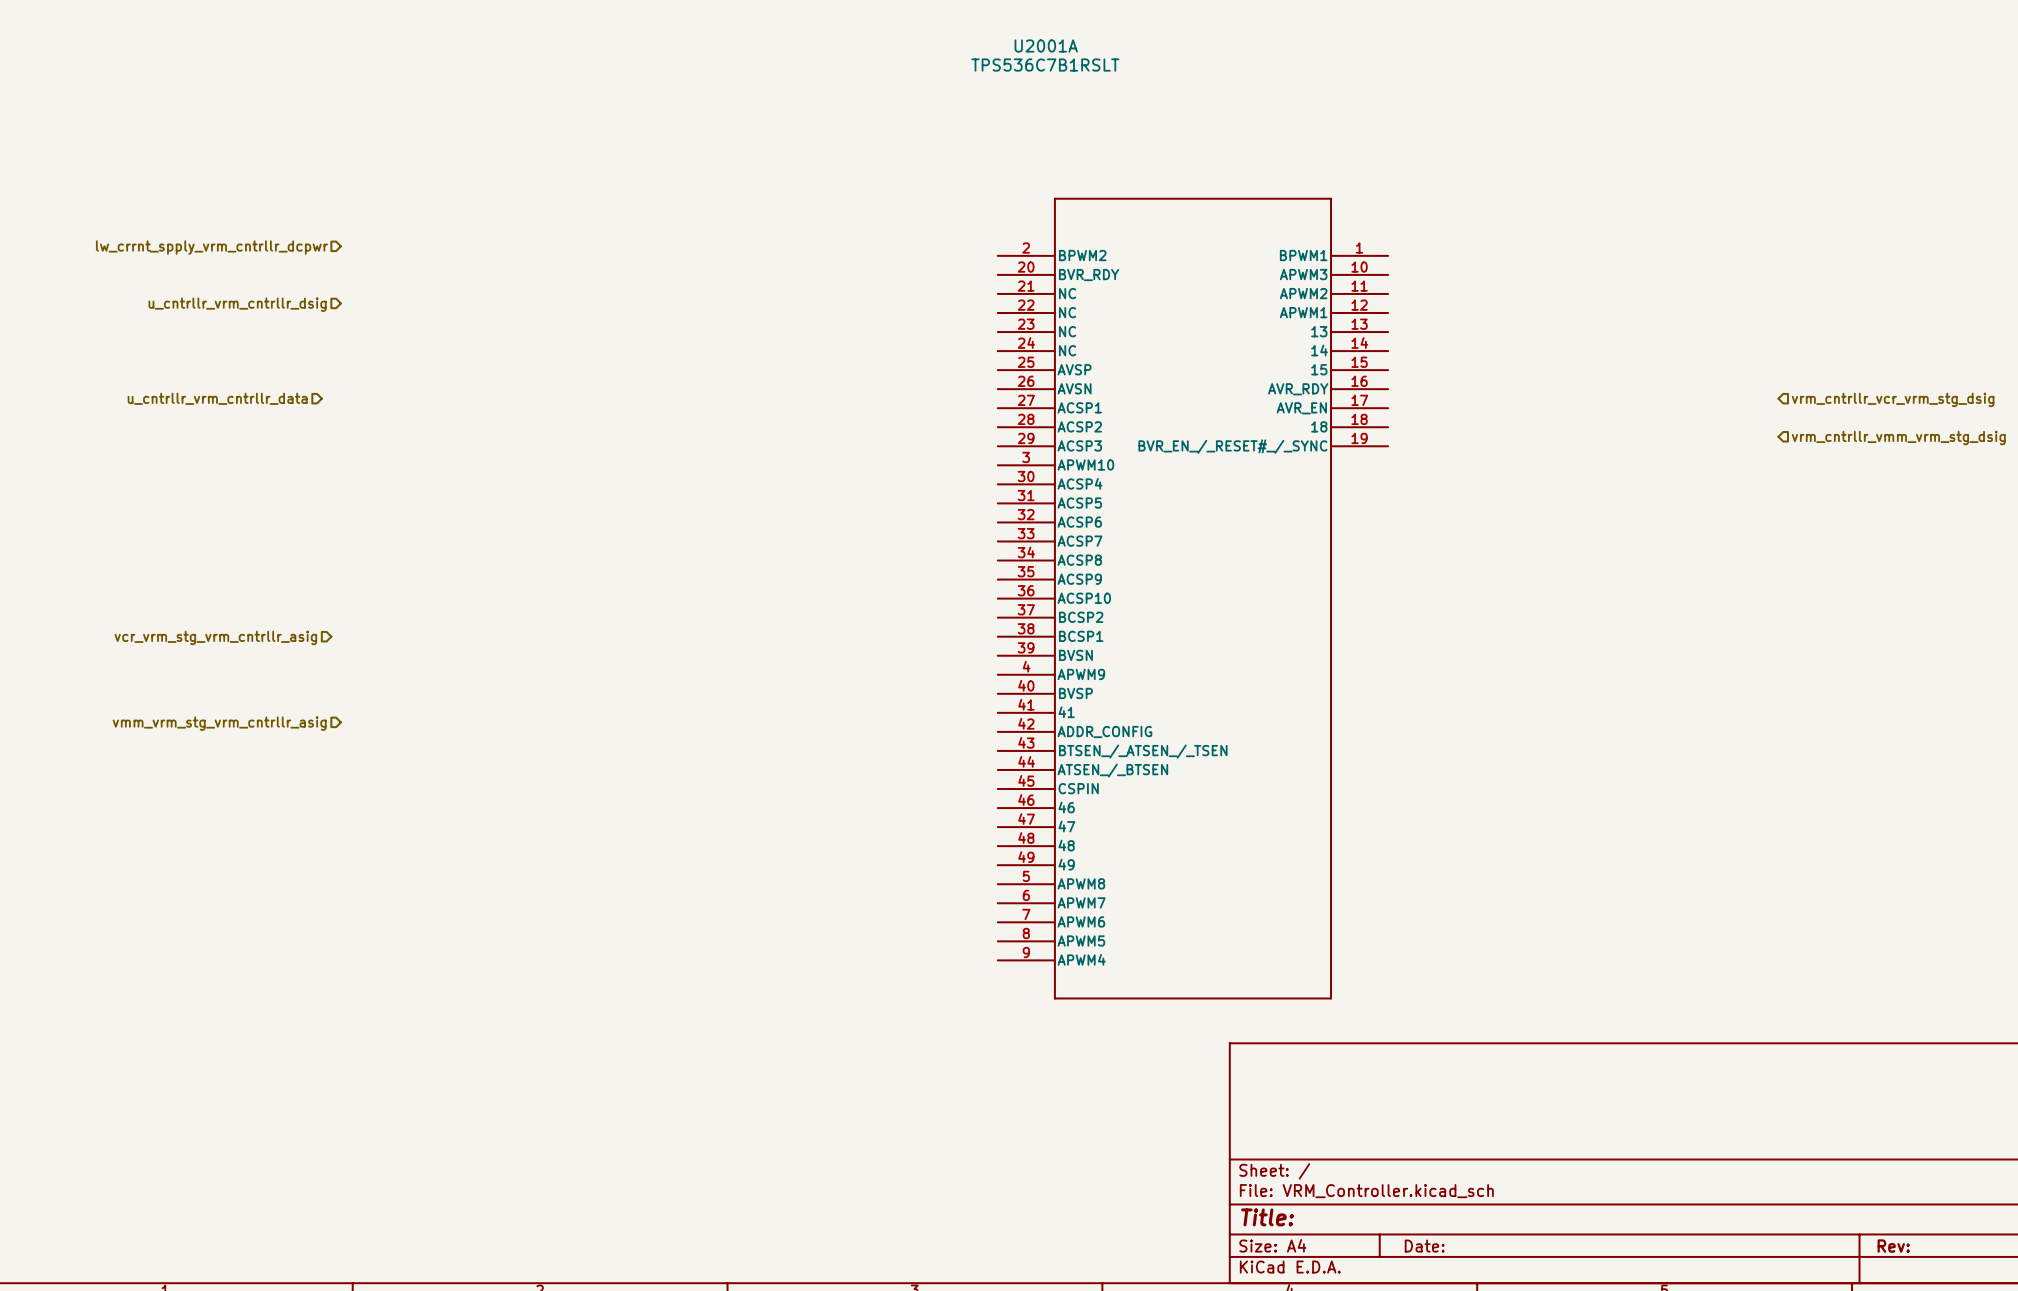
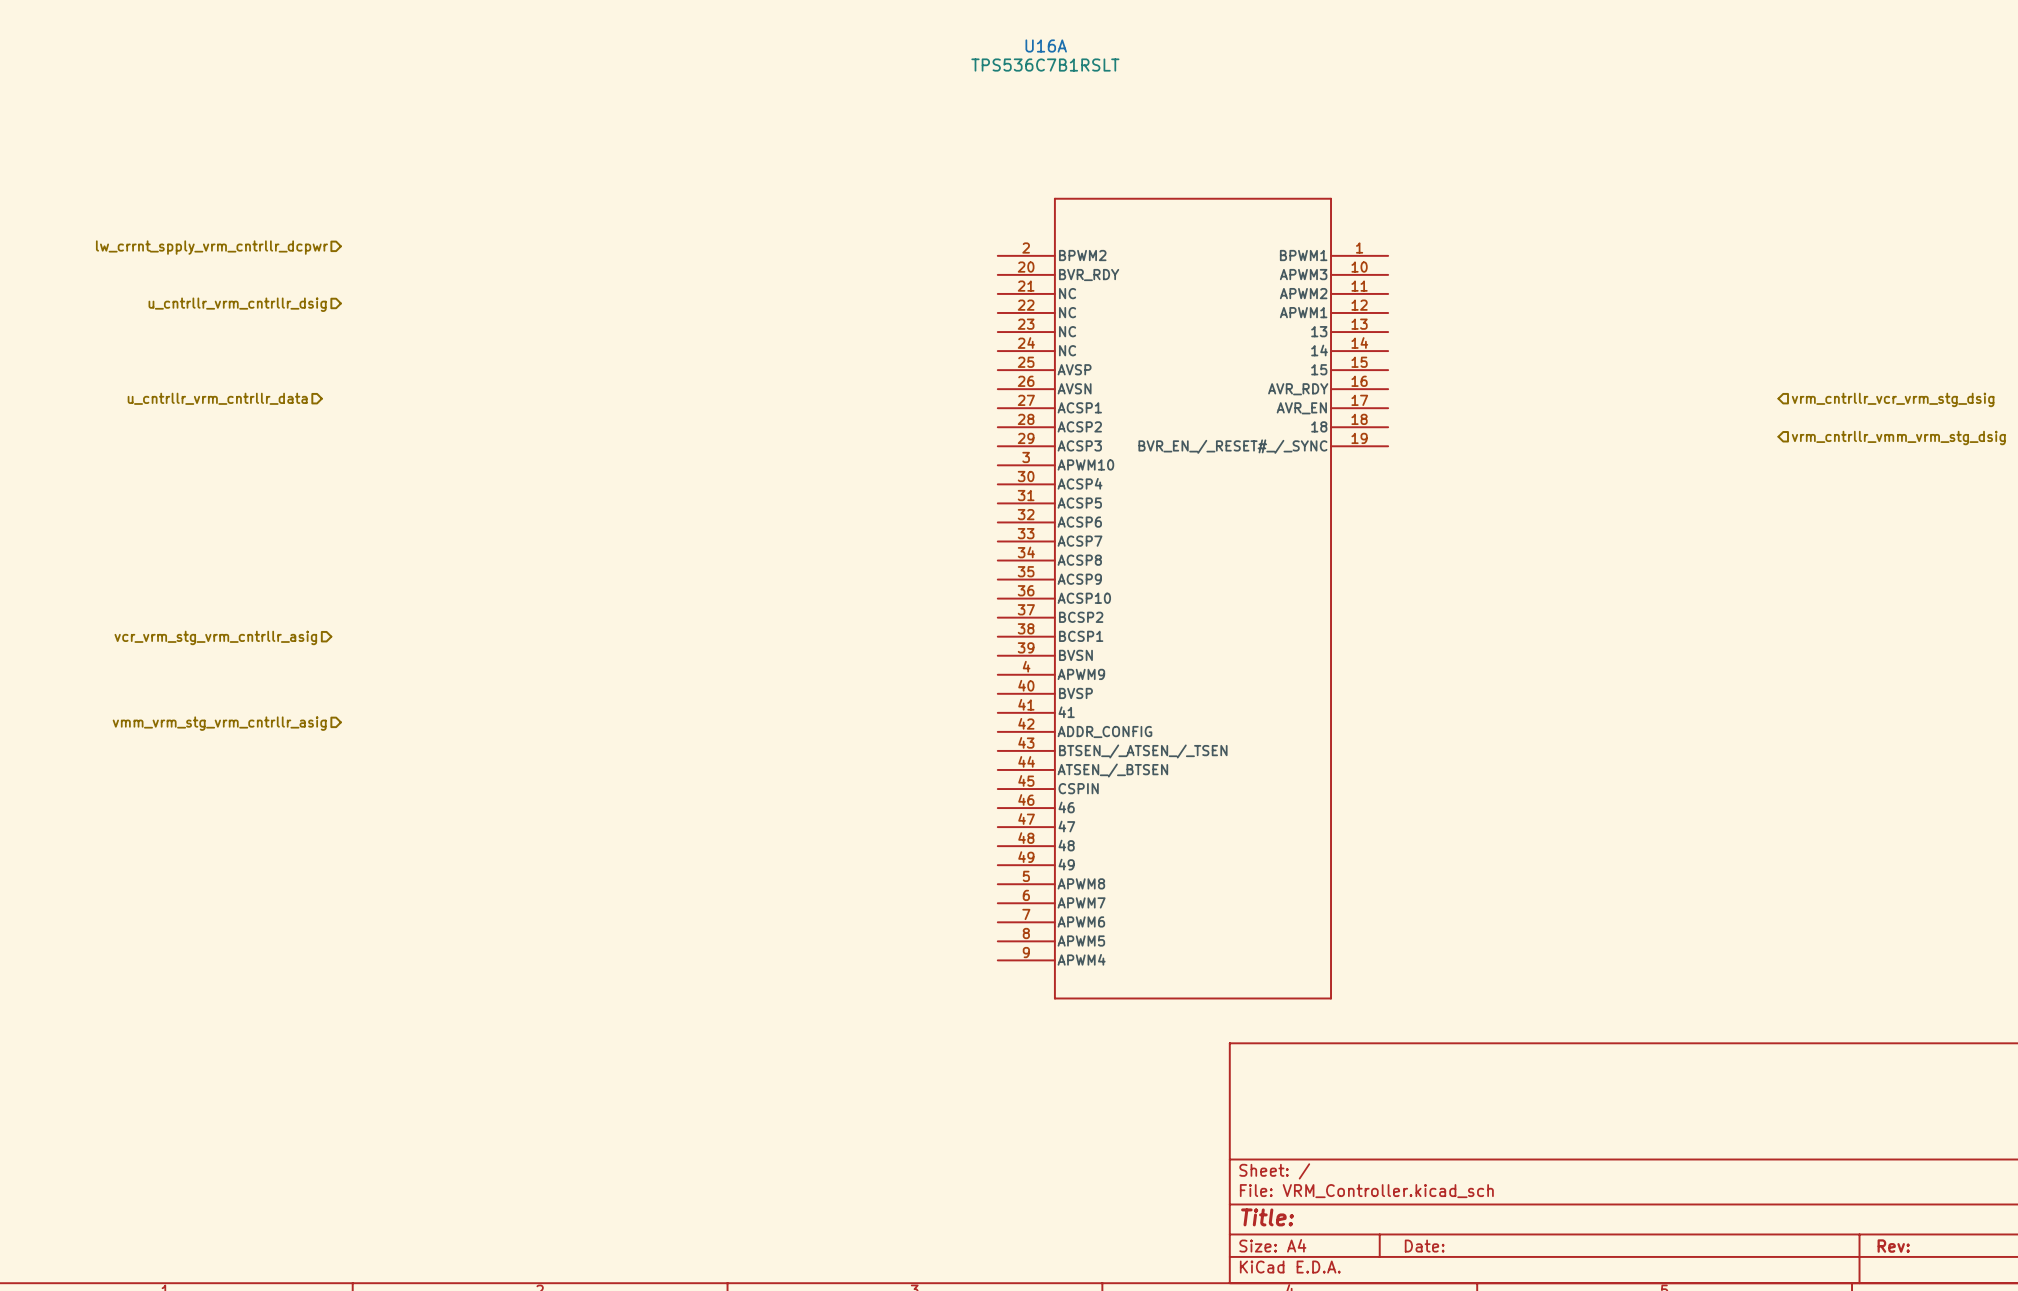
U2001A name: U2001A (1046, 45) -> U16A (1046, 45)

